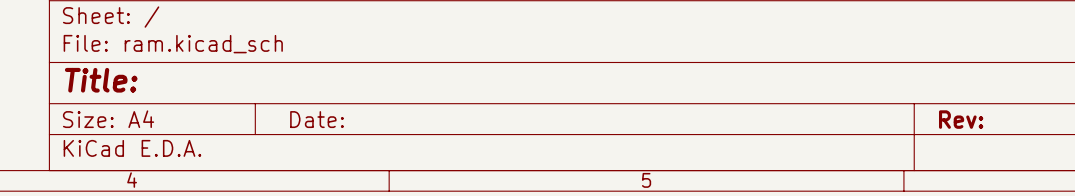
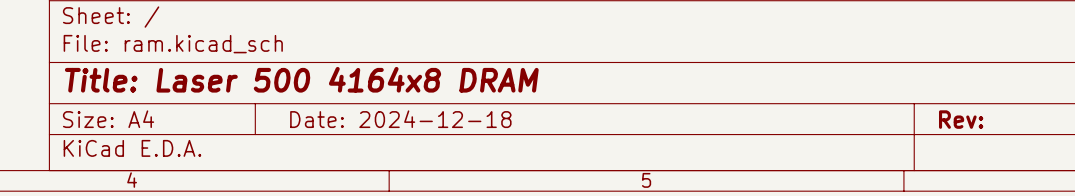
title block: Title: (101, 80) -> Title: Laser 500 4164x8 DRAM (301, 79)
title block: Date: (317, 119) -> Date: 2024-12-18 (400, 119)

